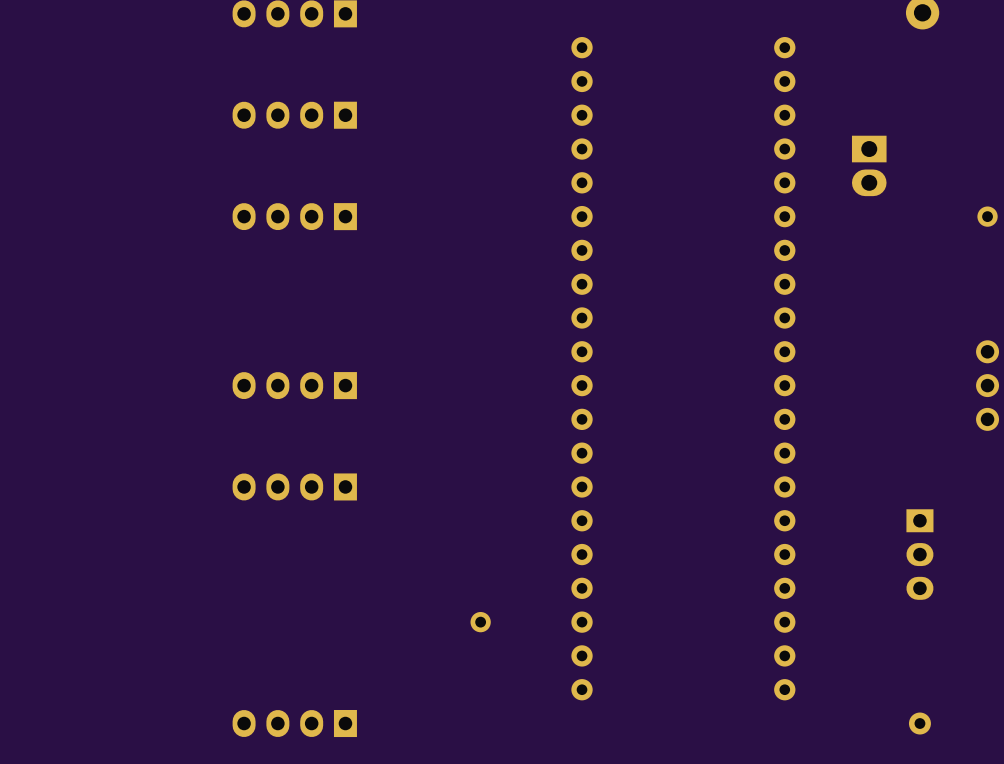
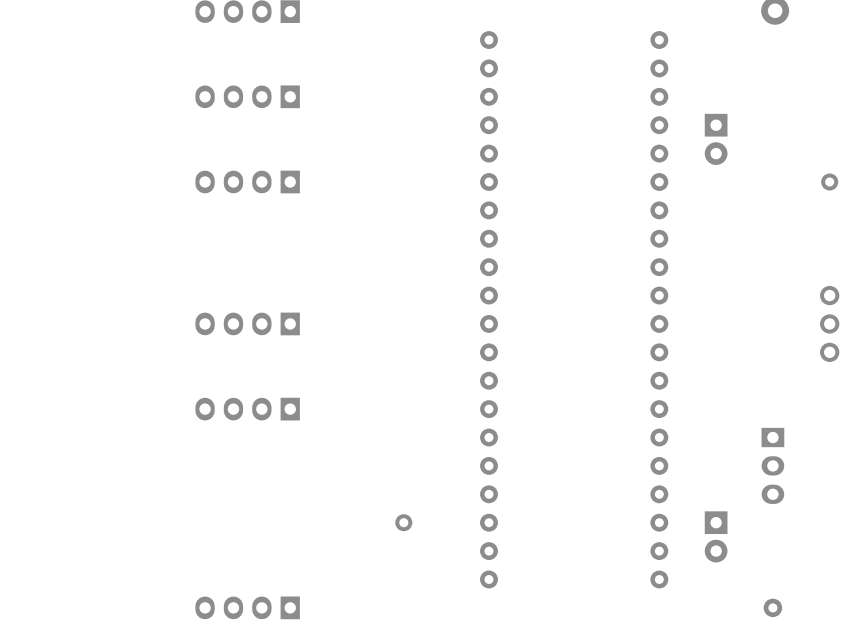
part: none -> (716, 139)
part: (869, 165) -> none
part: none -> (716, 536)

